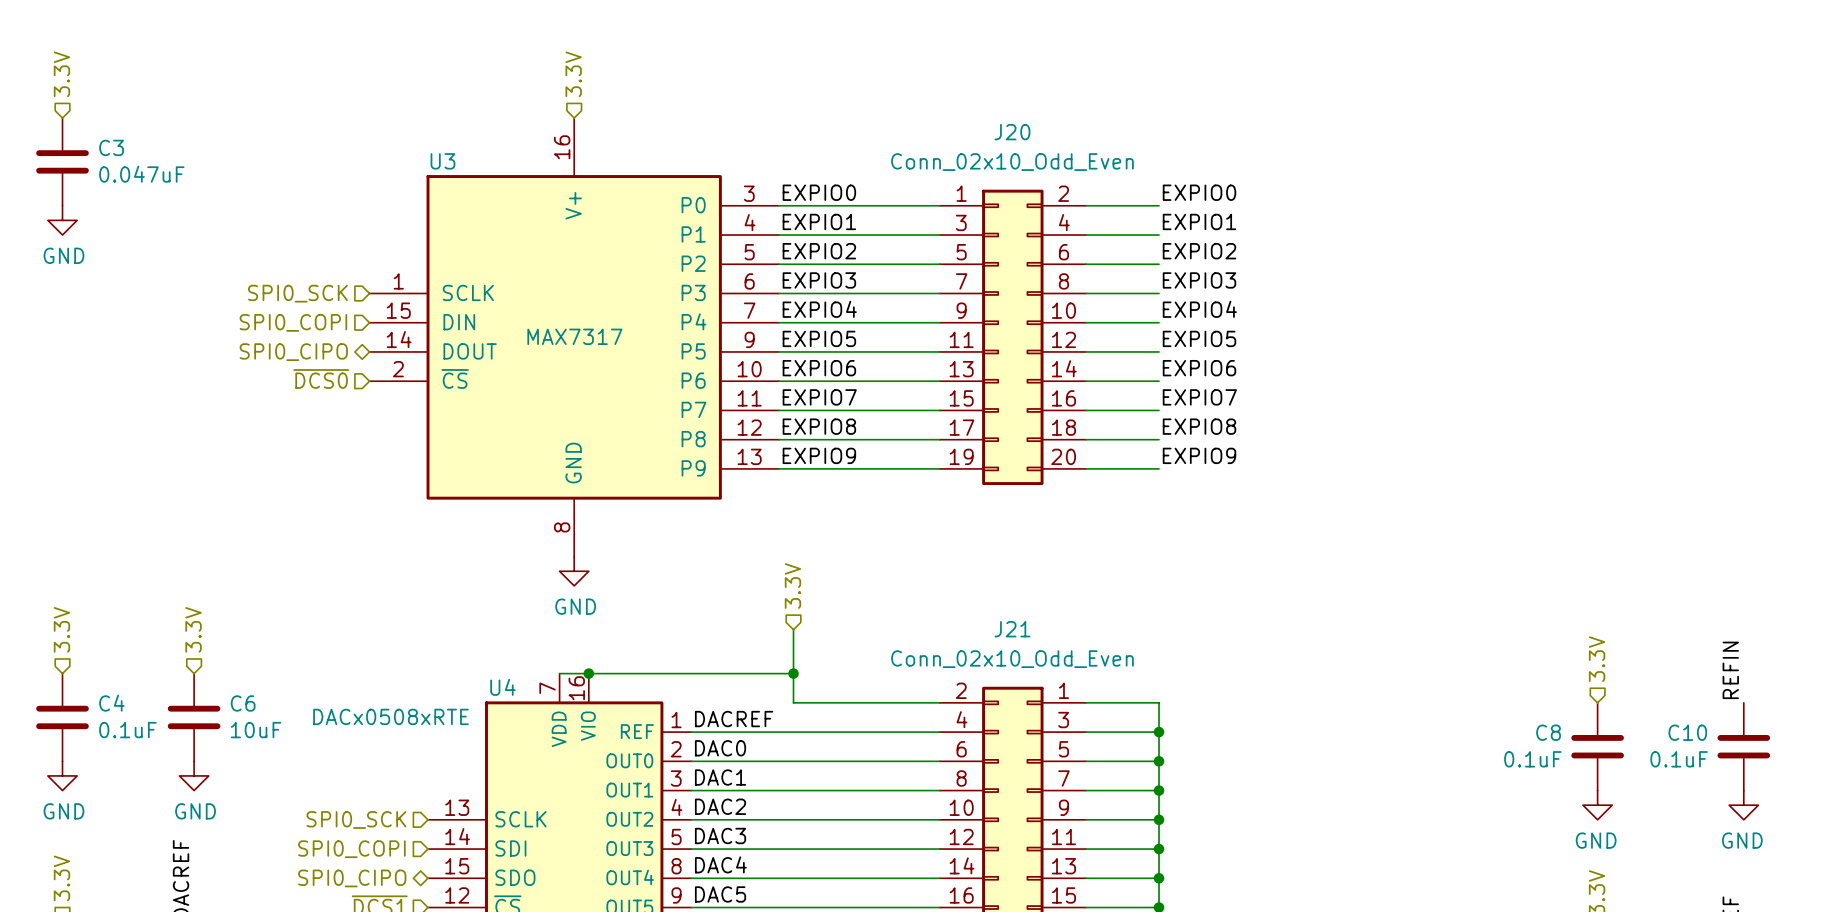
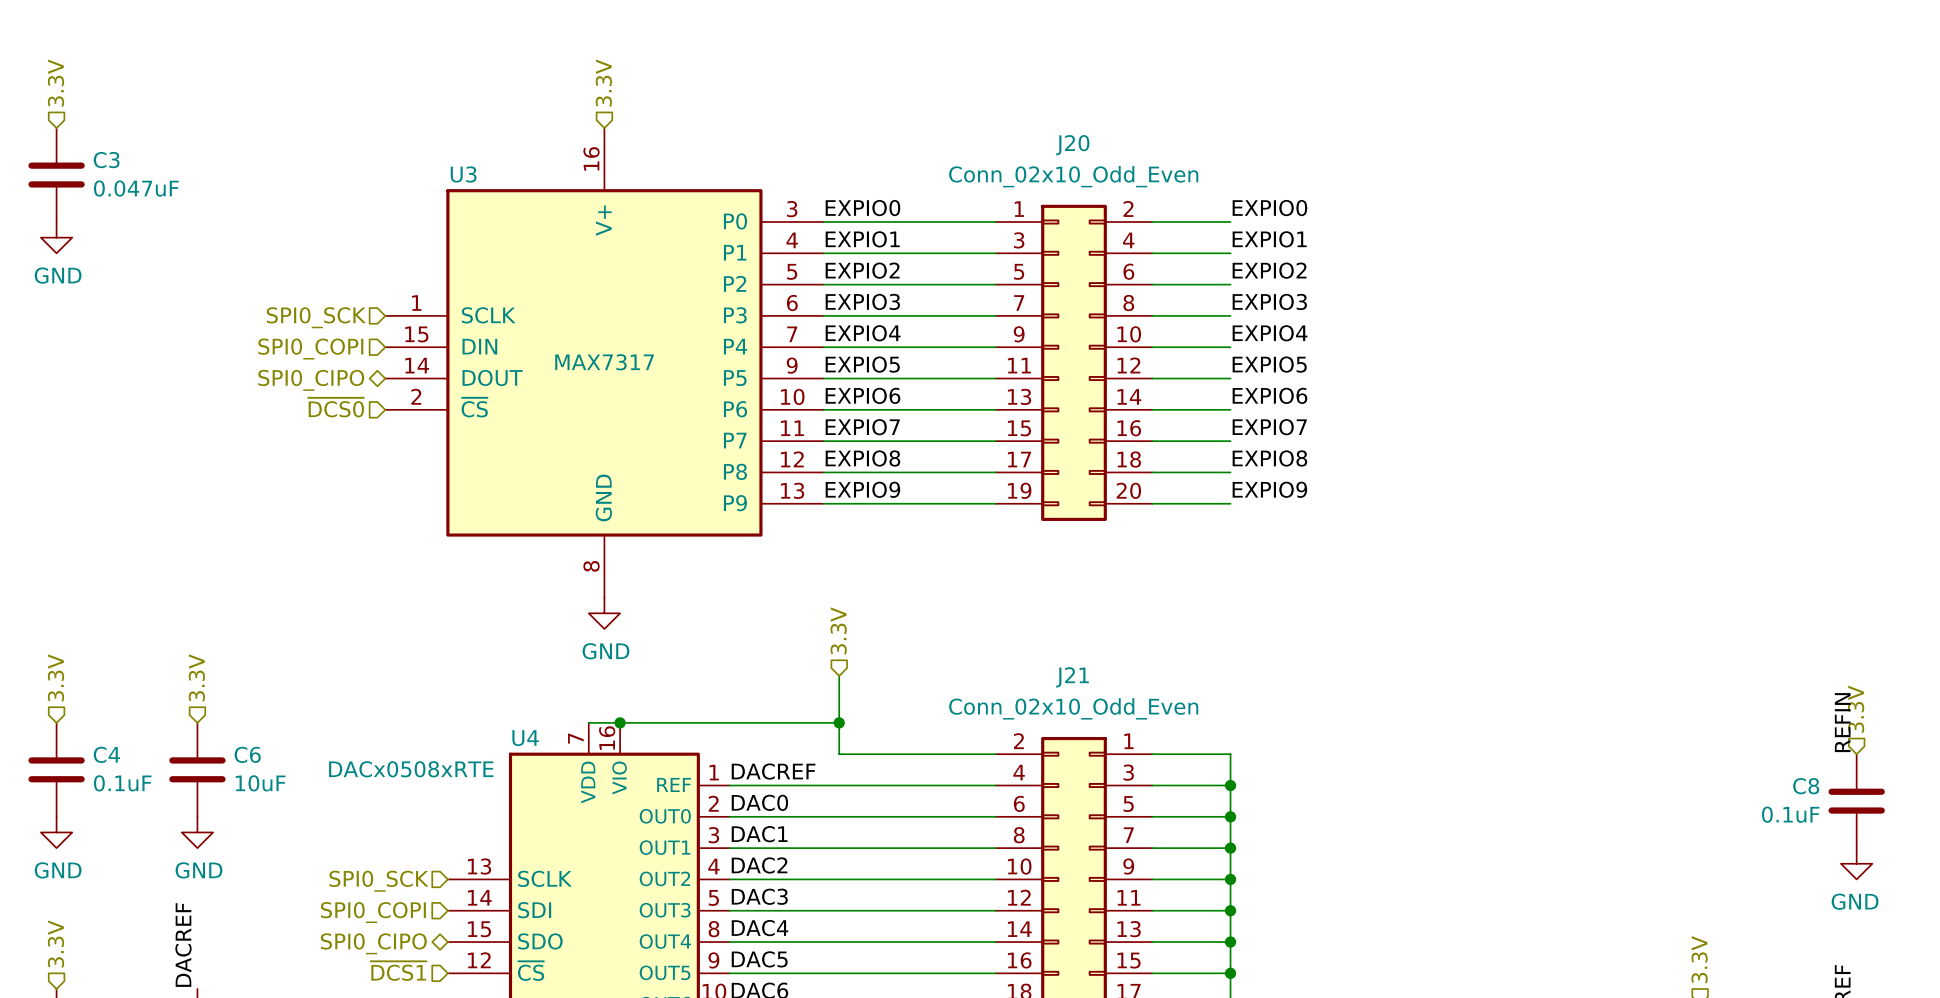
hierarchical label: 3.3V (1597, 659) -> none
hierarchical label: none -> 3.3V (1856, 709)
C10 name: C10 (1687, 732) -> C8 (1806, 786)
C8: 0.1uF (1597, 746) -> none
power symbol: GND (1597, 805) -> none

